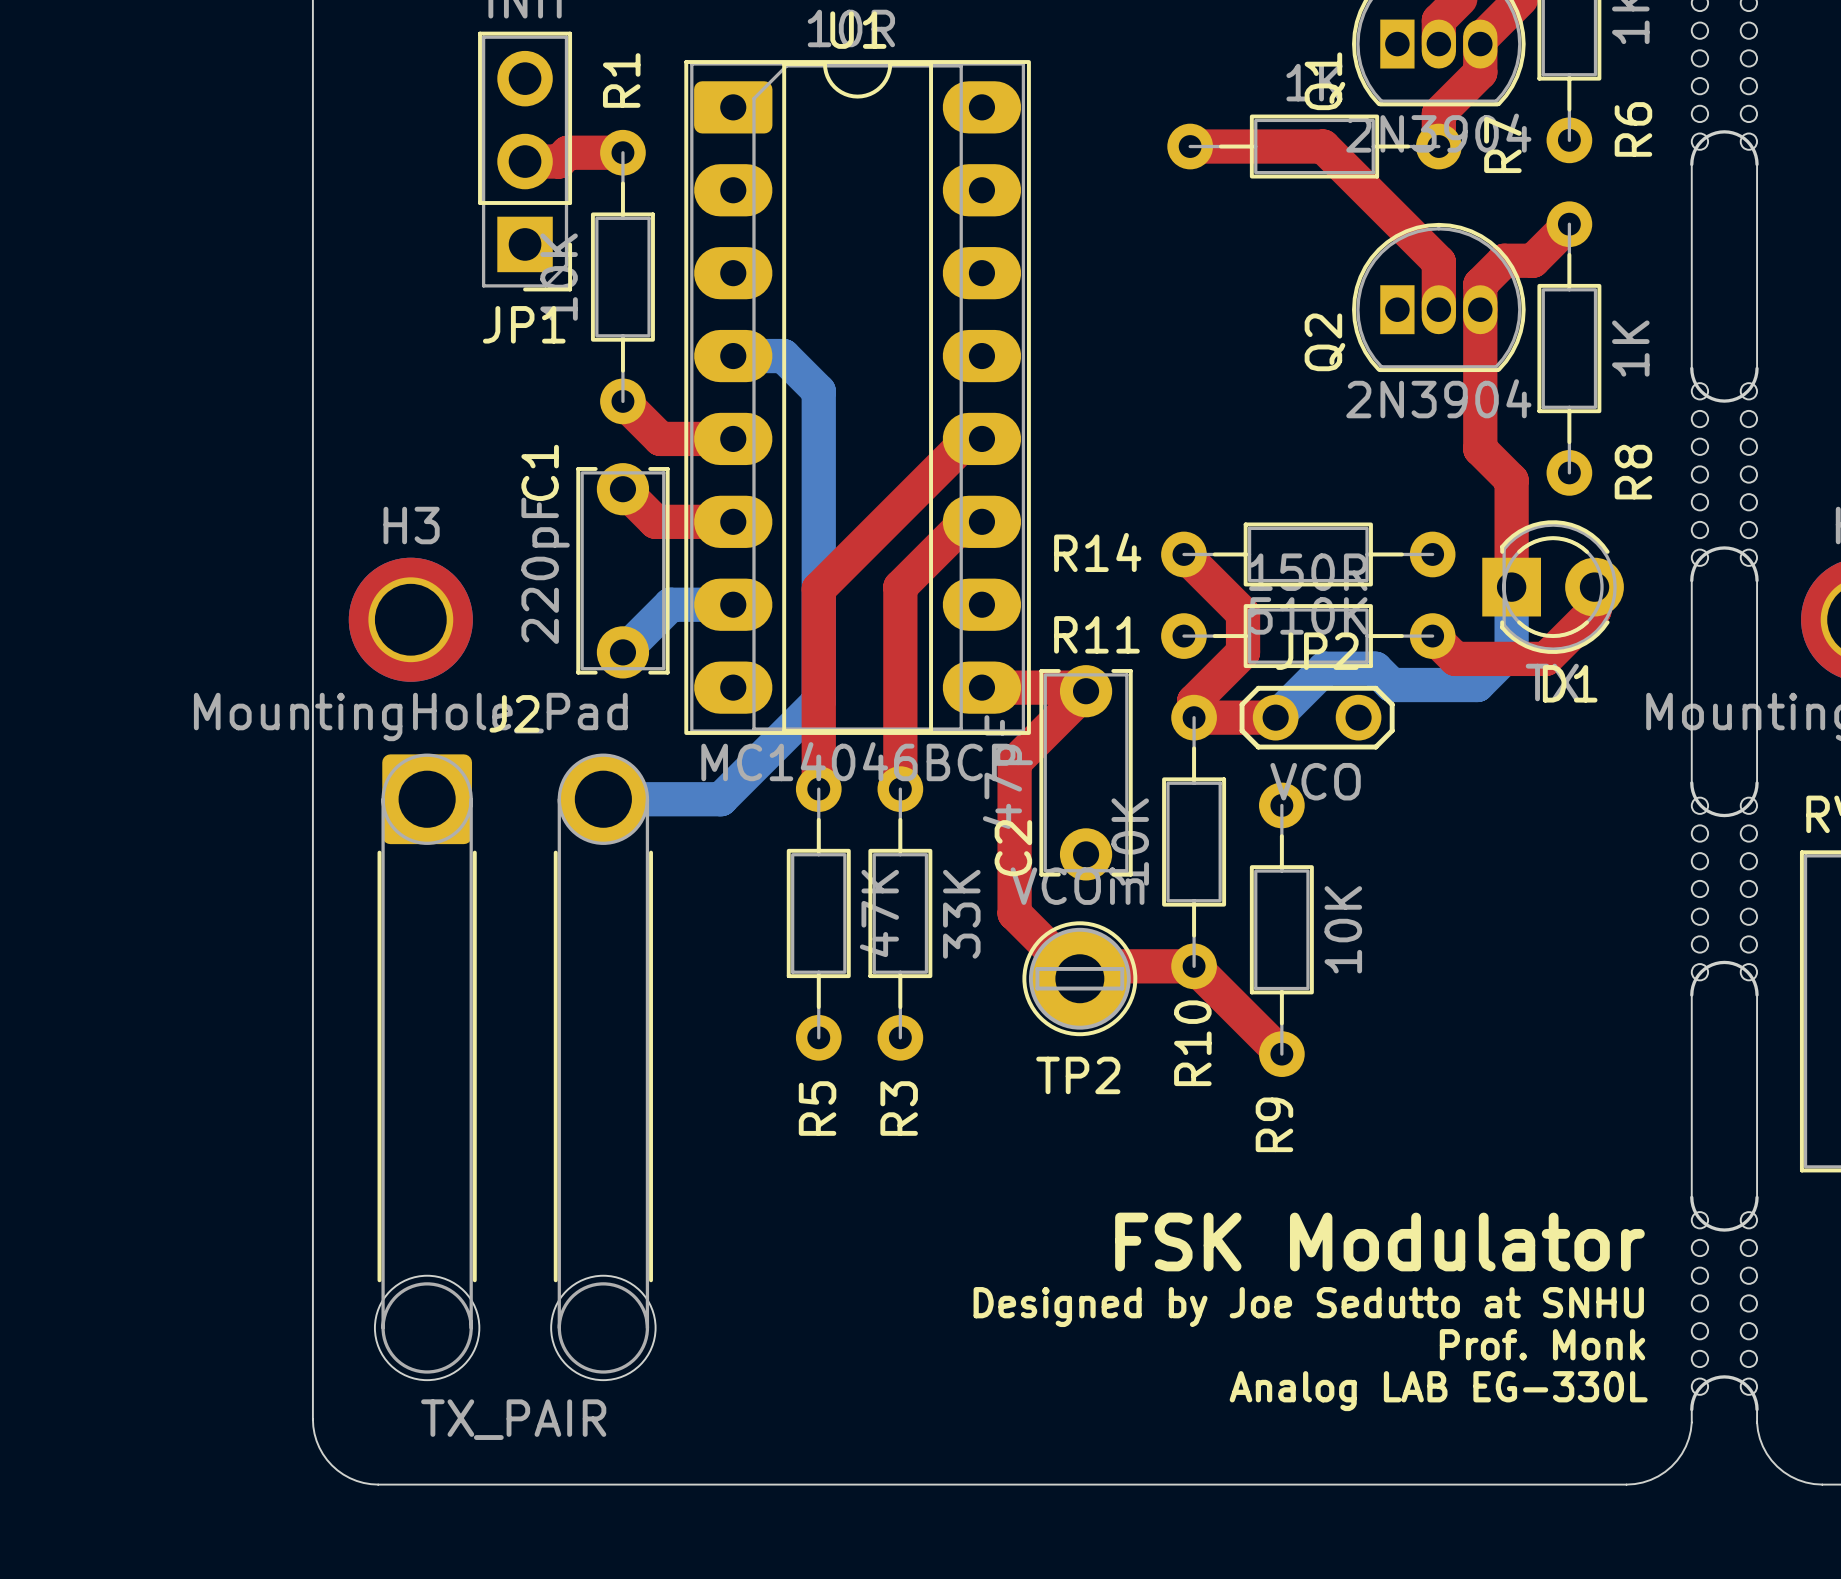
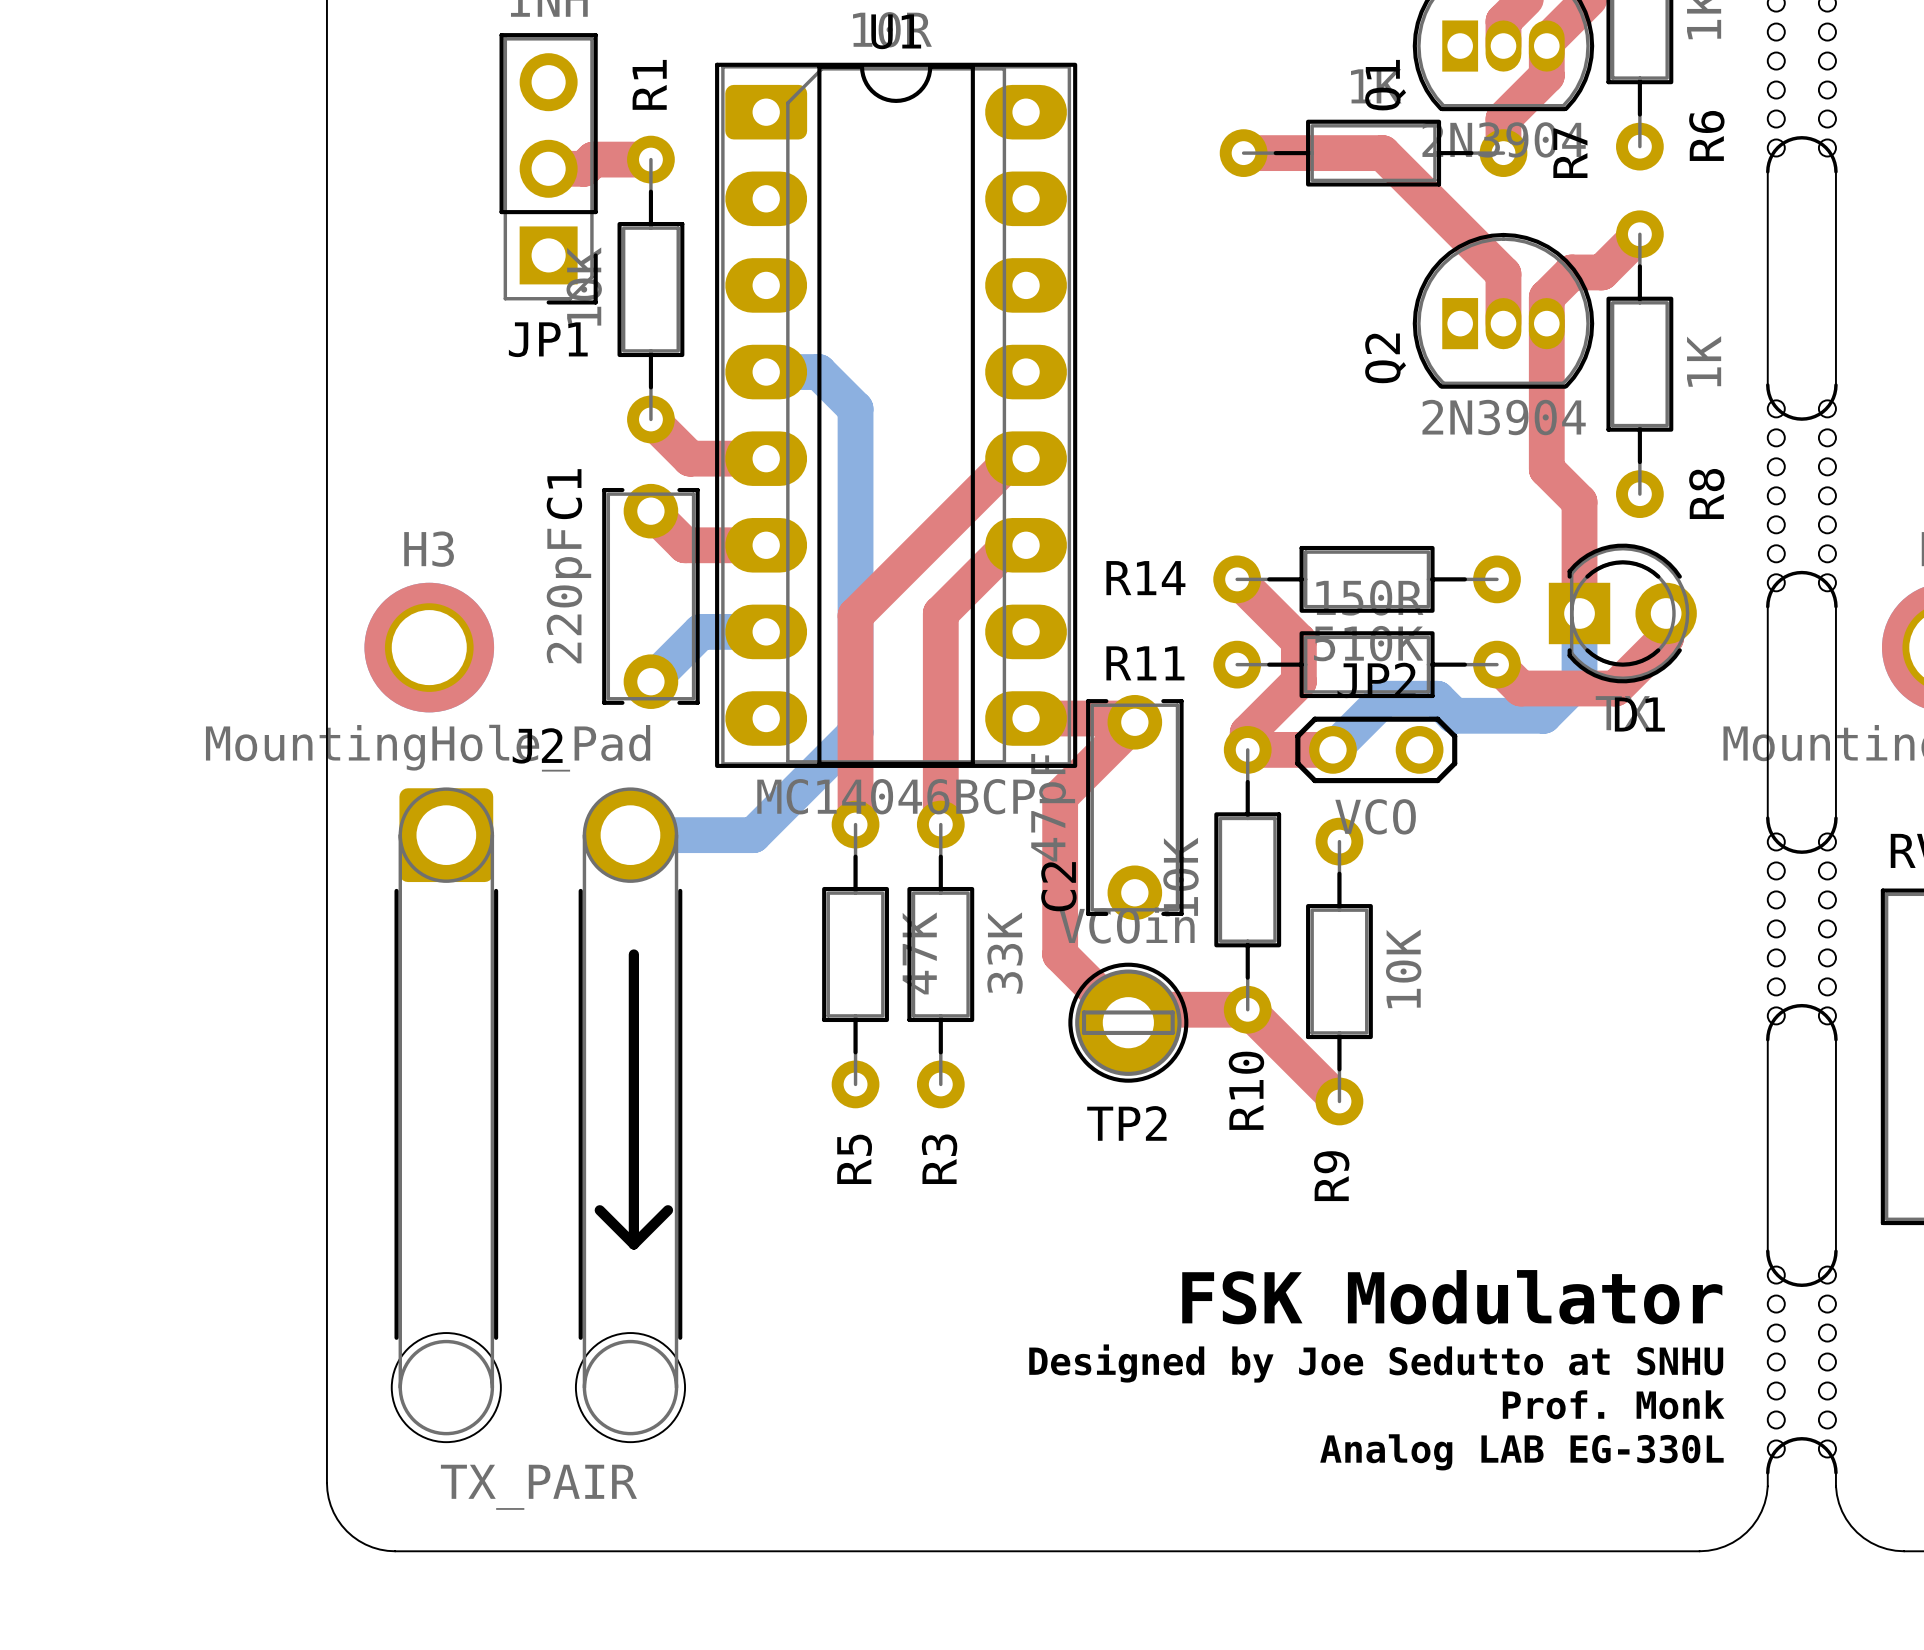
line: none -> (633, 954) (633, 1244)
line: none -> (599, 1210) (633, 1244)
line: none -> (667, 1210) (633, 1244)

